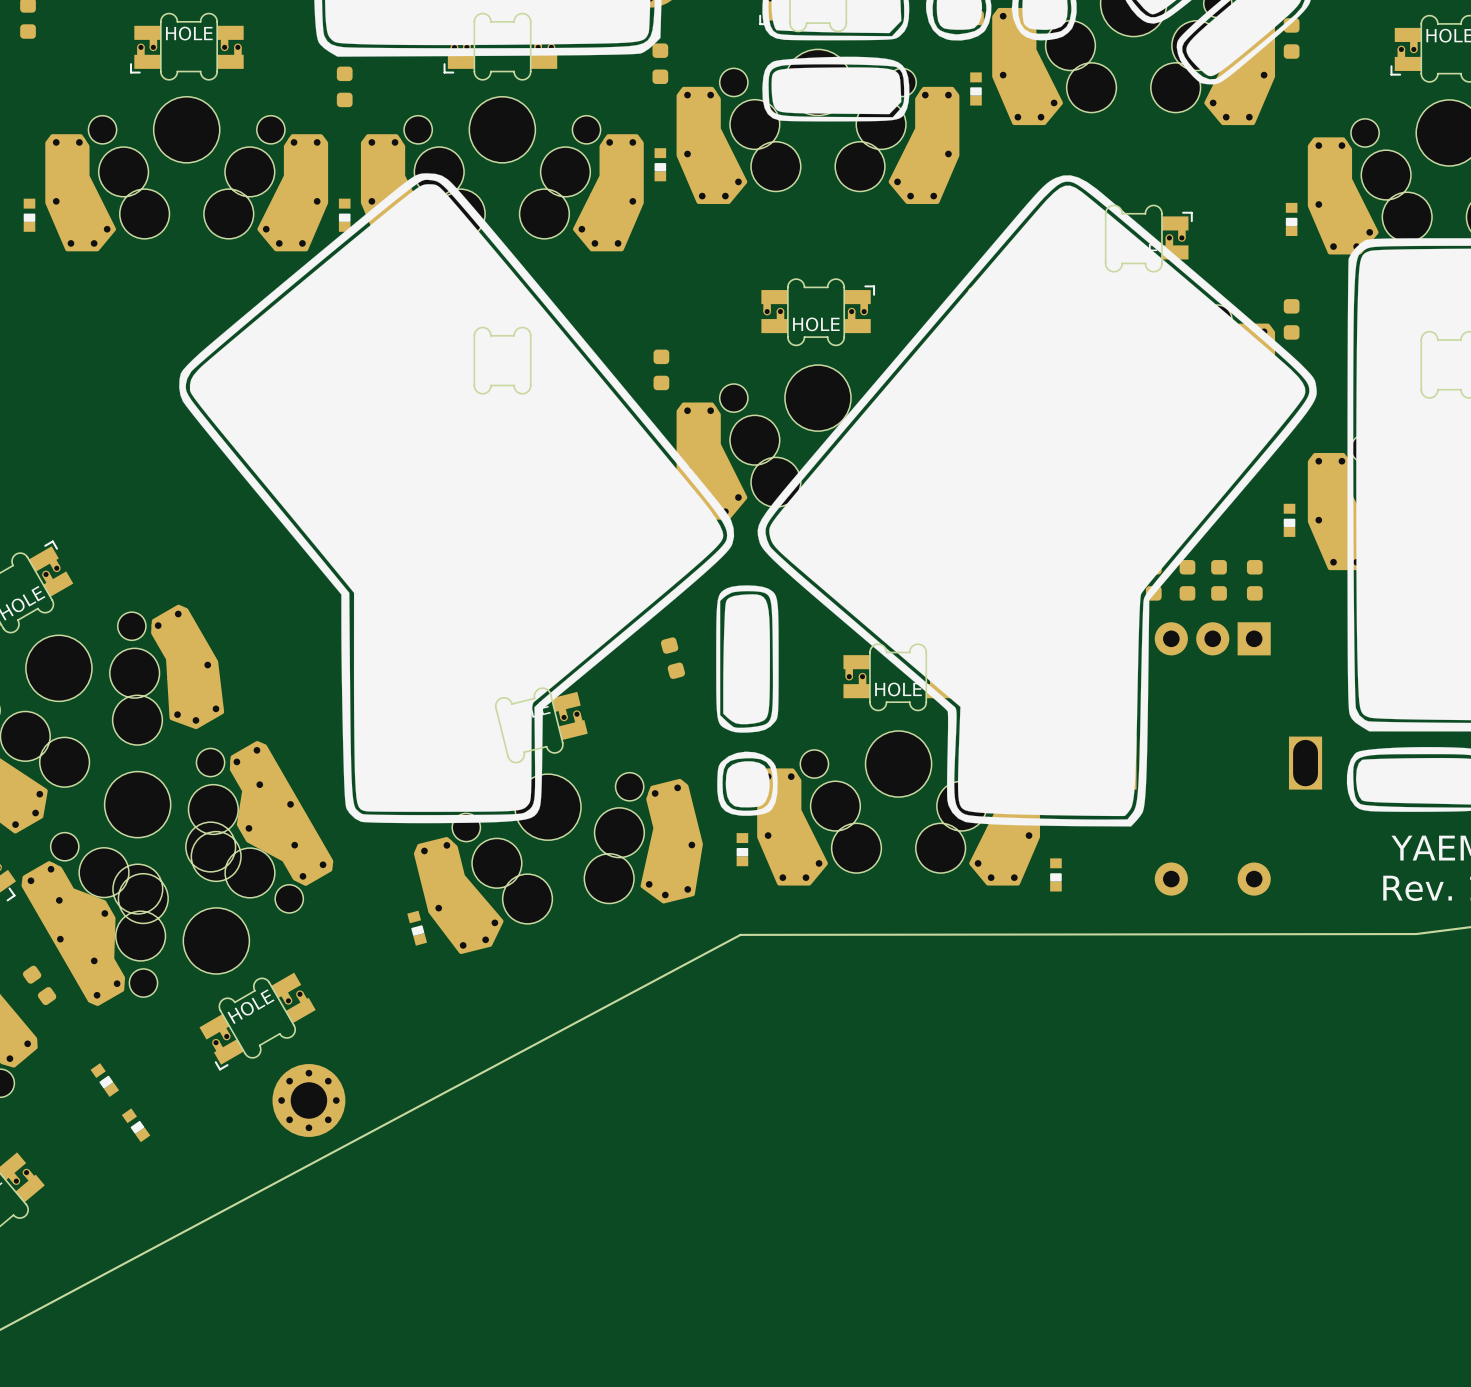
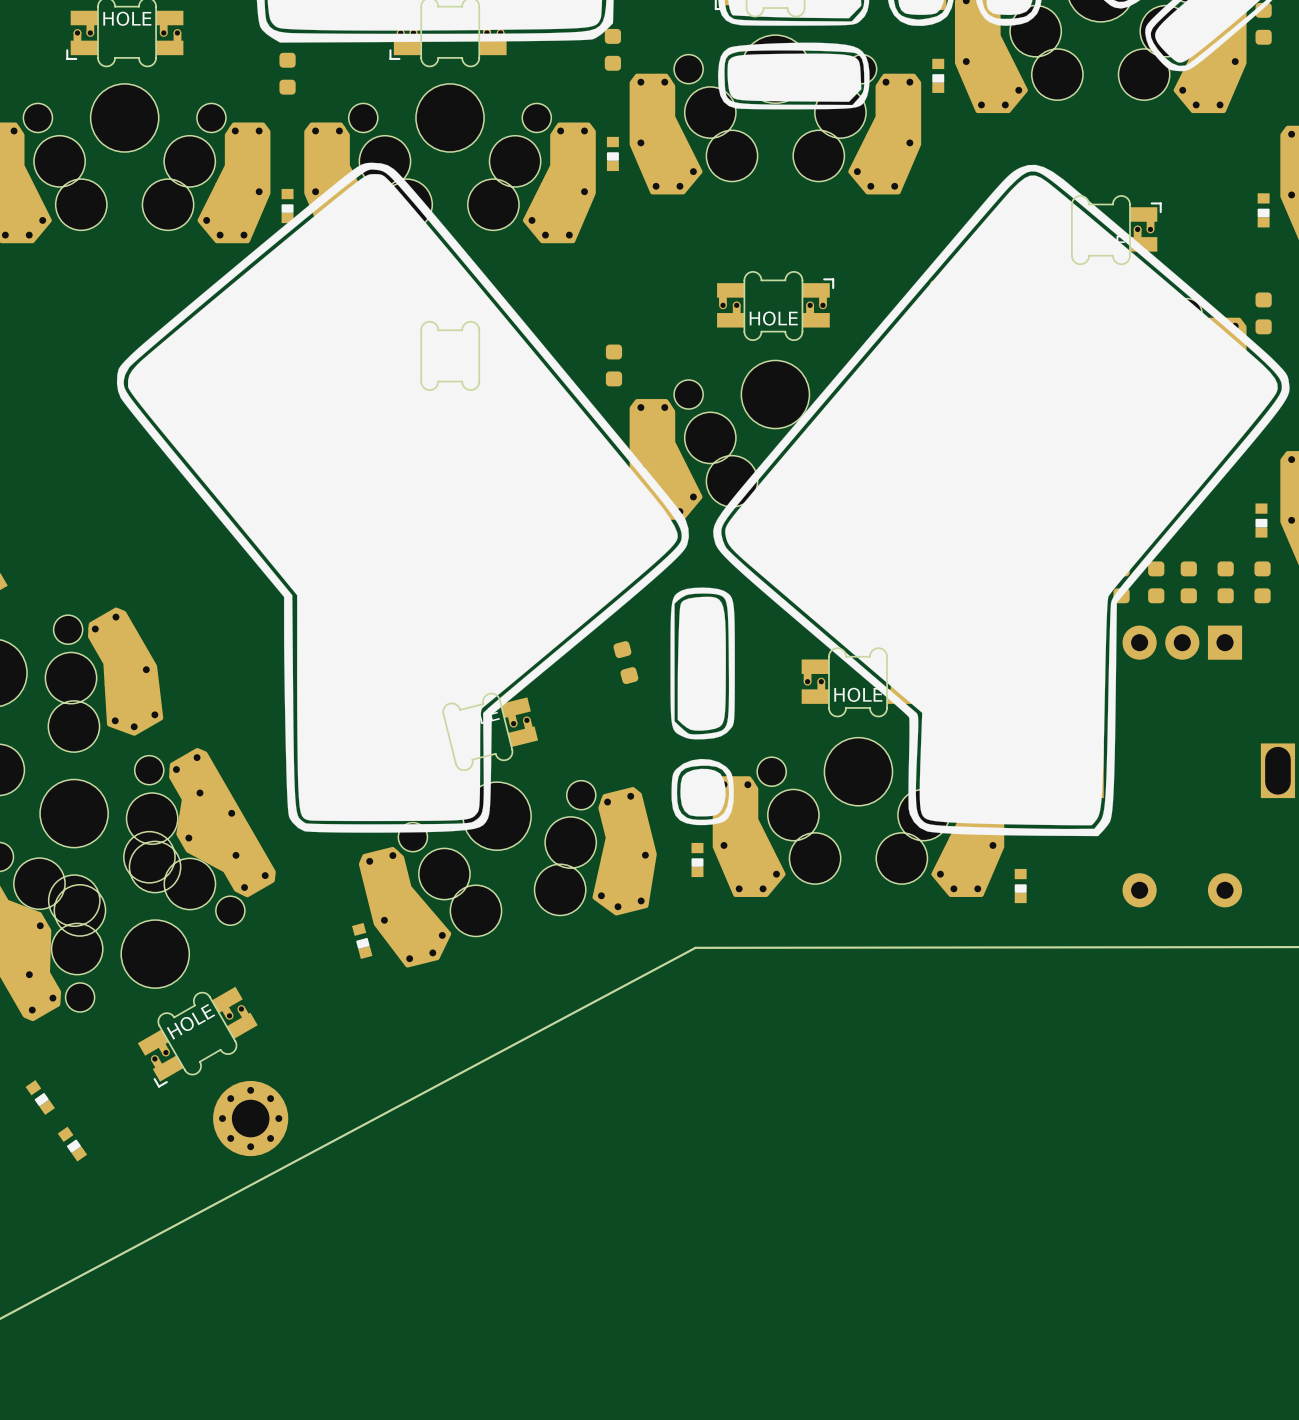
part: none -> (1262, 582)

